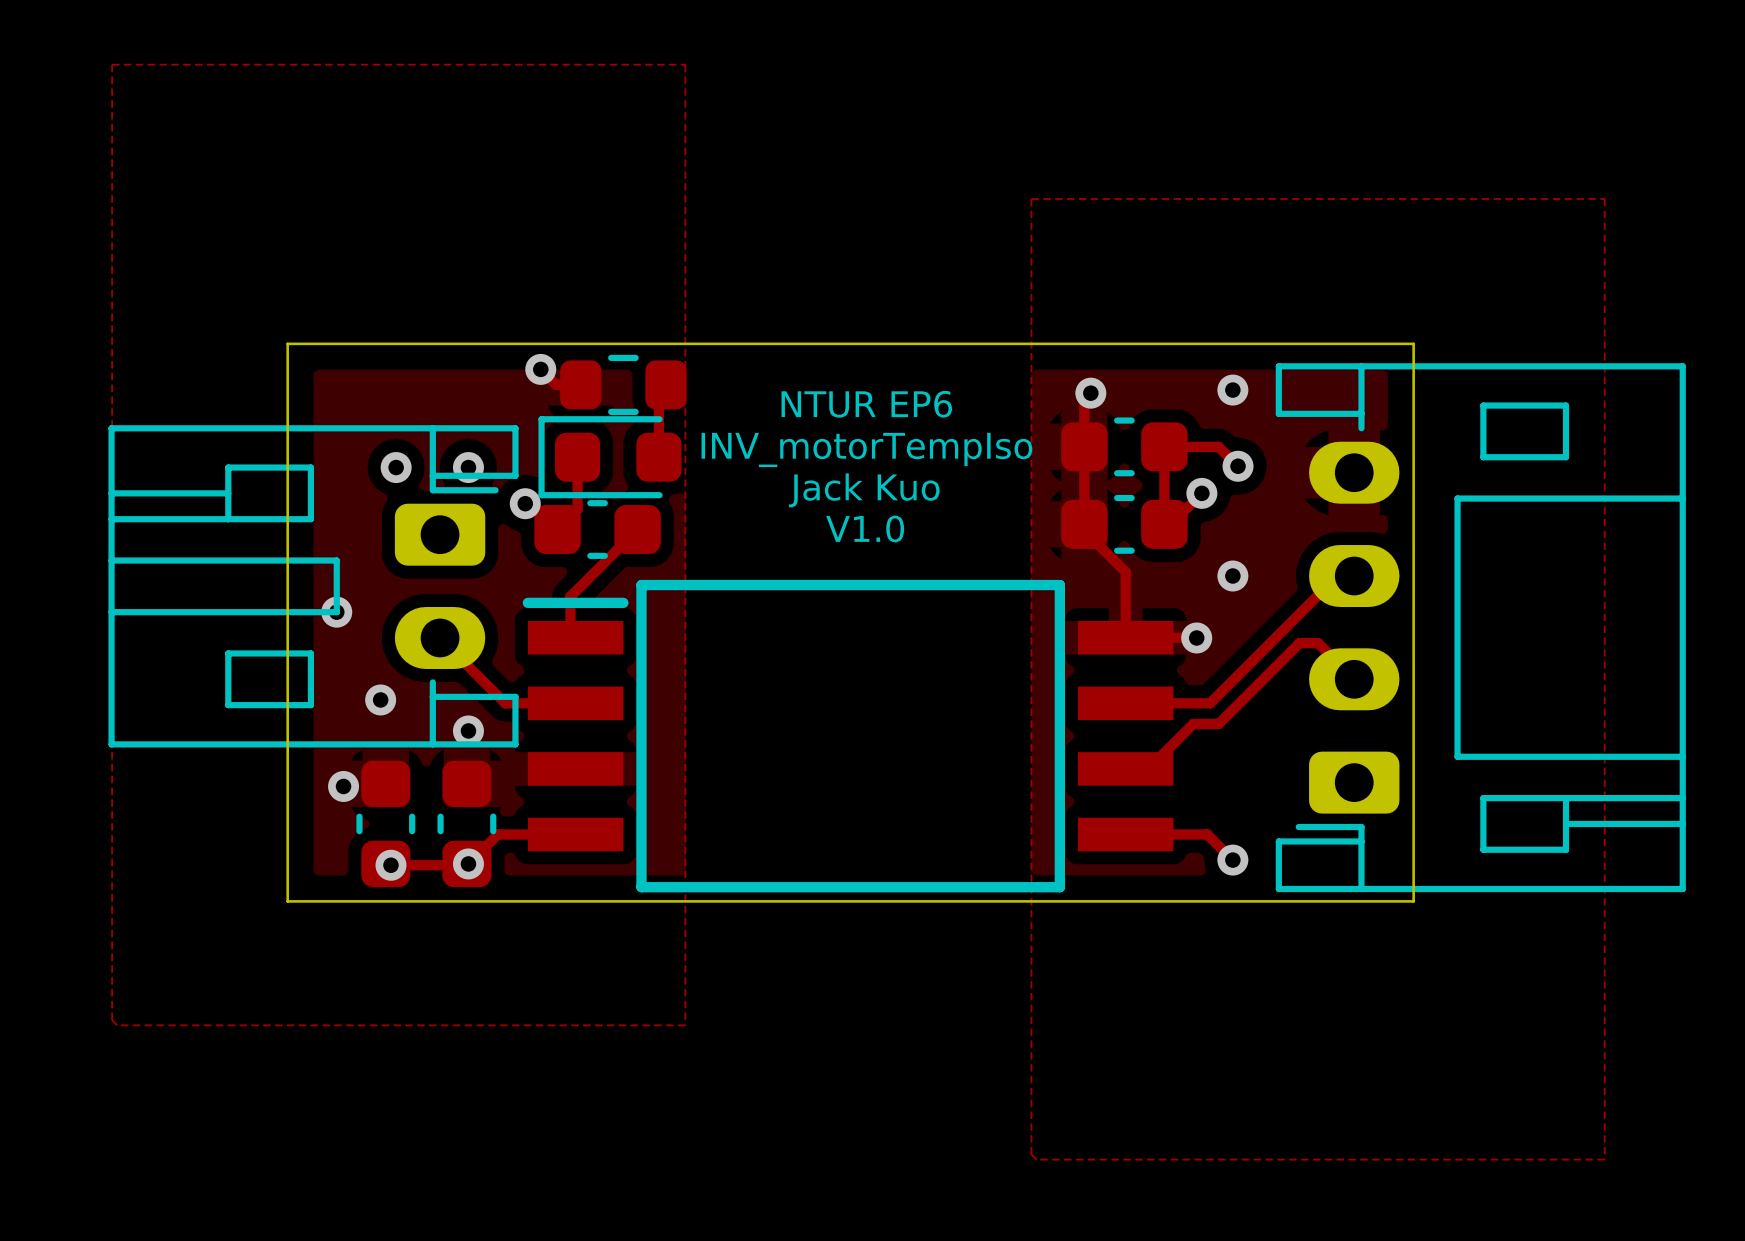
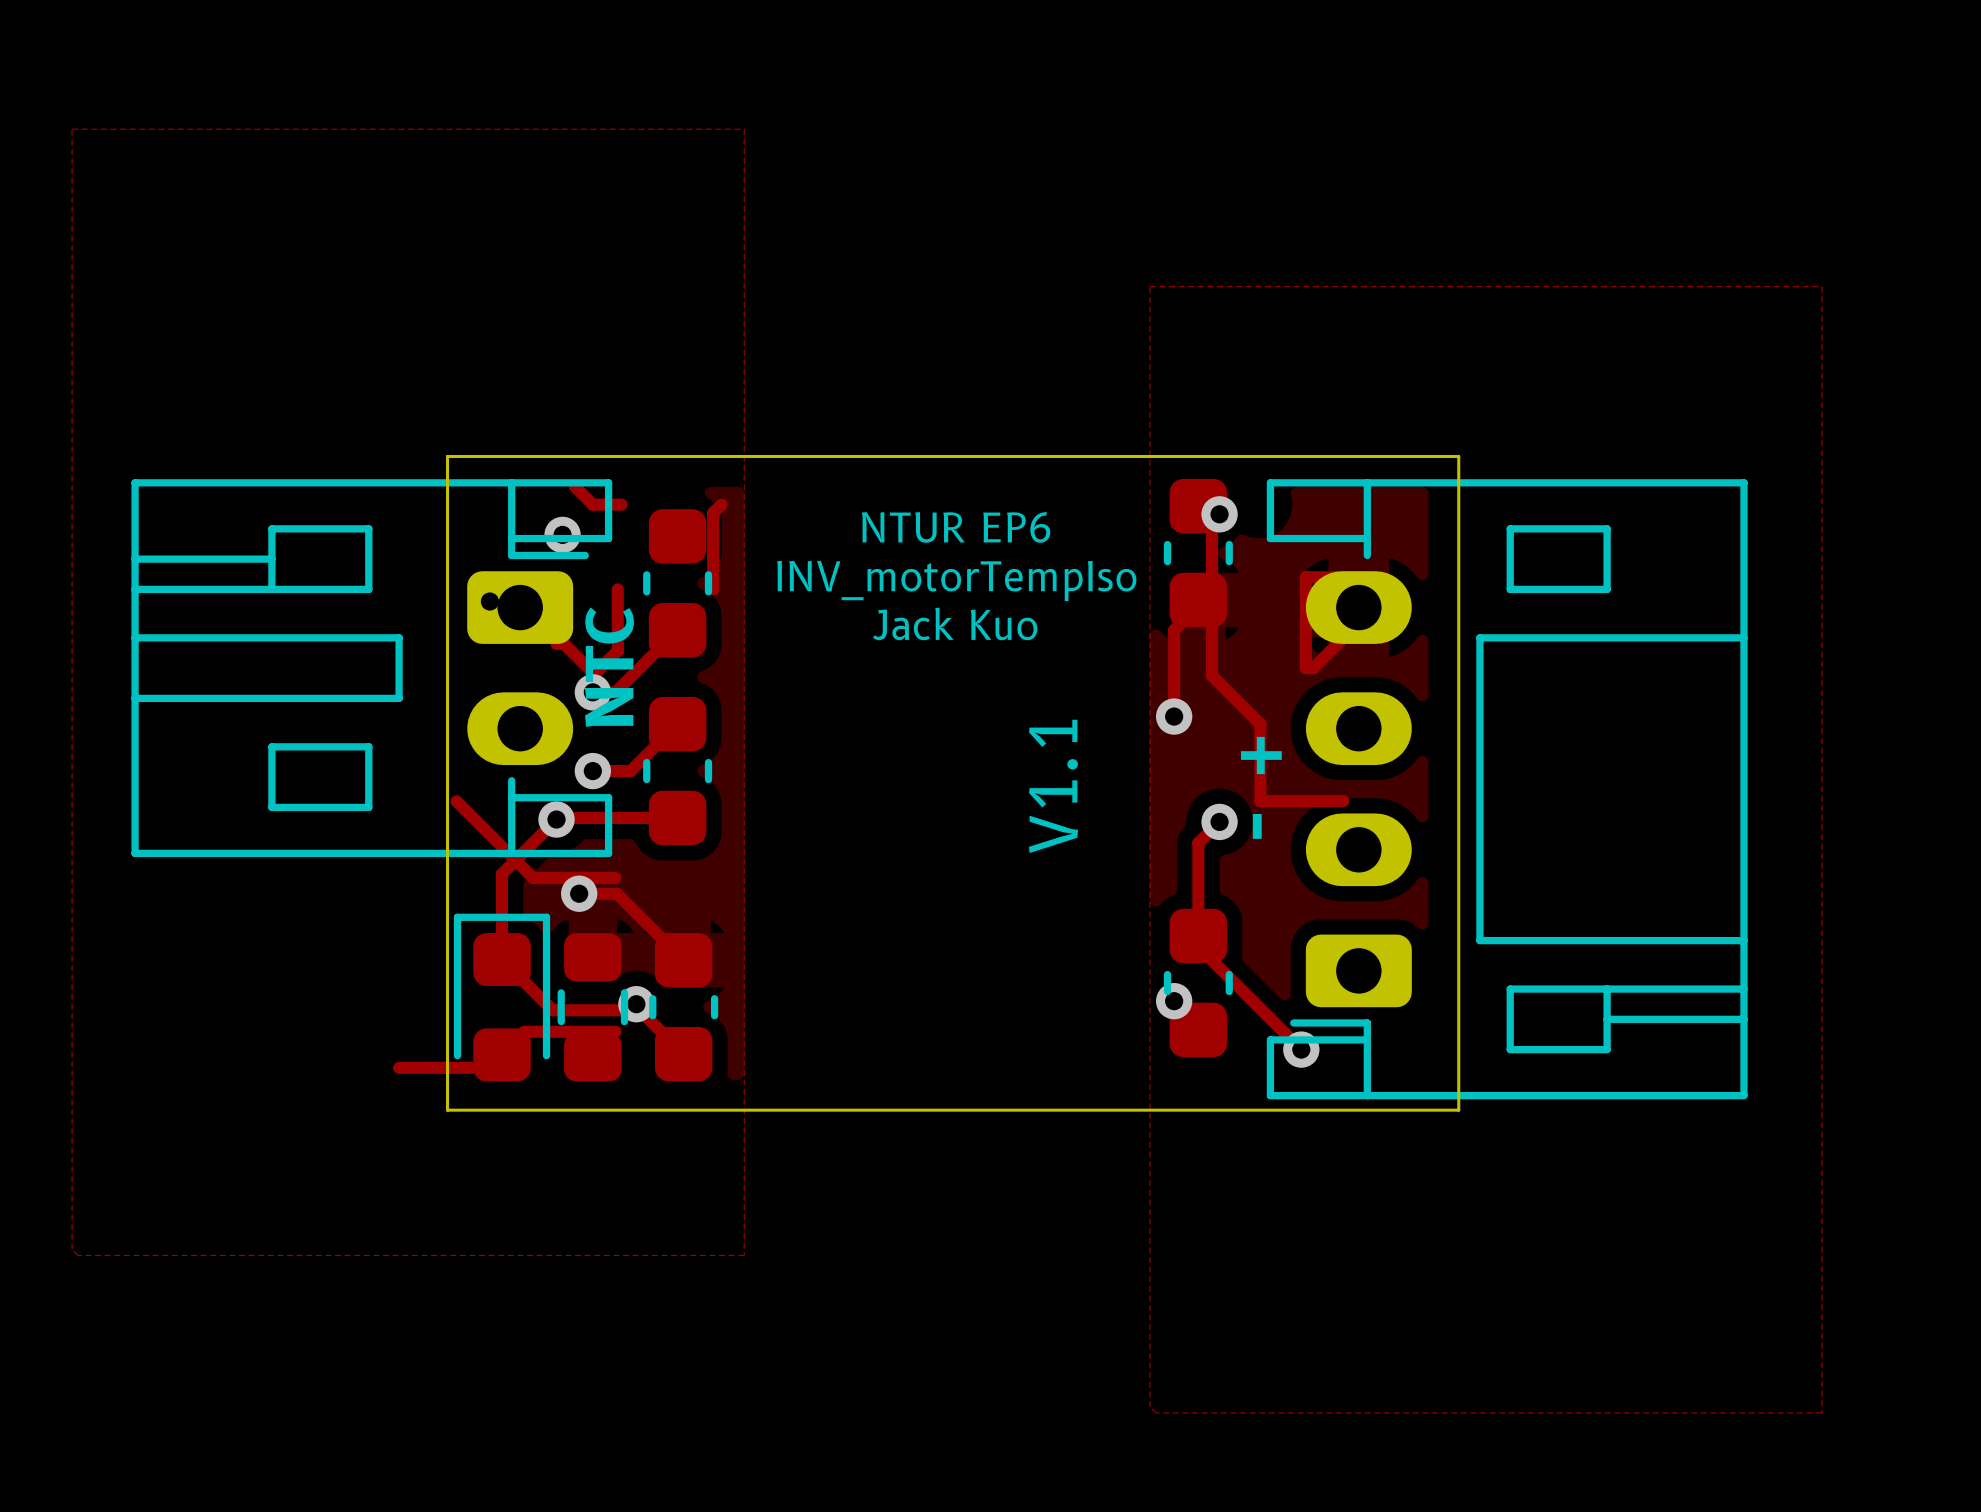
board edge: (432, 343) (287, 343) (287, 901) (432, 901) -> (447, 456) (447, 1110)
board edge: (1294, 343) (1413, 343) (1413, 901) (1294, 901) -> (1458, 456) (1458, 1110)
via position: (540, 369) -> (562, 534)
part rotation: 0° (623, 384) -> 90° clockwise (592, 1007)
part position: (623, 384) -> (592, 1007)
via: (1232, 390) -> none
part footprint: [538, 416, 682, 499] -> [643, 509, 713, 658]
part: none -> (1198, 553)
part: (1124, 446) -> none
via: (1238, 466) -> none
via: (396, 467) -> none
track: none -> (1198, 606) (1174, 630) (1174, 716)
track: none -> (677, 630) (615, 692) (592, 692)
via: (1201, 493) -> none
via: (525, 503) -> none
text: none -> NTC (609, 667)
part: (1124, 524) -> none
text: V1.0 (865, 528) -> V1.1 (1053, 786)
part rotation: 0° (597, 529) -> 90° clockwise (677, 771)
part position: (597, 529) -> (677, 771)
track: (637, 529) (570, 596) (570, 632) (575, 637) -> none
via: none -> (592, 692)
via: none -> (1174, 716)
track: none -> (677, 724) (630, 771) (592, 771)
via: (1232, 576) -> none
track: (1354, 576) (1337, 576) (1210, 703) (1125, 703) -> none
part position: (313, 586) -> (371, 668)
via: (336, 612) -> none
via: none -> (592, 771)
part position: (1480, 627) -> (1507, 789)
text: none -> + - (1261, 787)
via: (1196, 637) -> none
track: none -> (677, 818) (558, 818) (502, 874) (502, 959) (552, 1010) (639, 1010) (683, 1054)
via: none -> (556, 819)
track: none -> (1219, 821) (1198, 843) (1198, 946) (1301, 1049)
via: none -> (1219, 821)
track: (1354, 679) (1318, 643) (1299, 643) (1218, 723) (1193, 723) (1148, 768) (1125, 768) -> none
via: (380, 699) -> none
track: none -> (579, 893) (617, 893) (683, 960)
via: none -> (579, 893)
via: (468, 730) -> none
part: (848, 736) -> none
part footprint: [437, 760, 497, 888] -> [453, 913, 551, 1082]
via: (343, 786) -> none
part: none -> (1198, 983)
via: none -> (1174, 1001)
via: none -> (636, 1004)
part: none -> (683, 1007)
part: (385, 823) -> none
track: (1125, 834) (1207, 834) (1232, 860) -> none
via position: (1232, 860) -> (1301, 1049)
via: (468, 863) -> none
via: (390, 865) -> none

